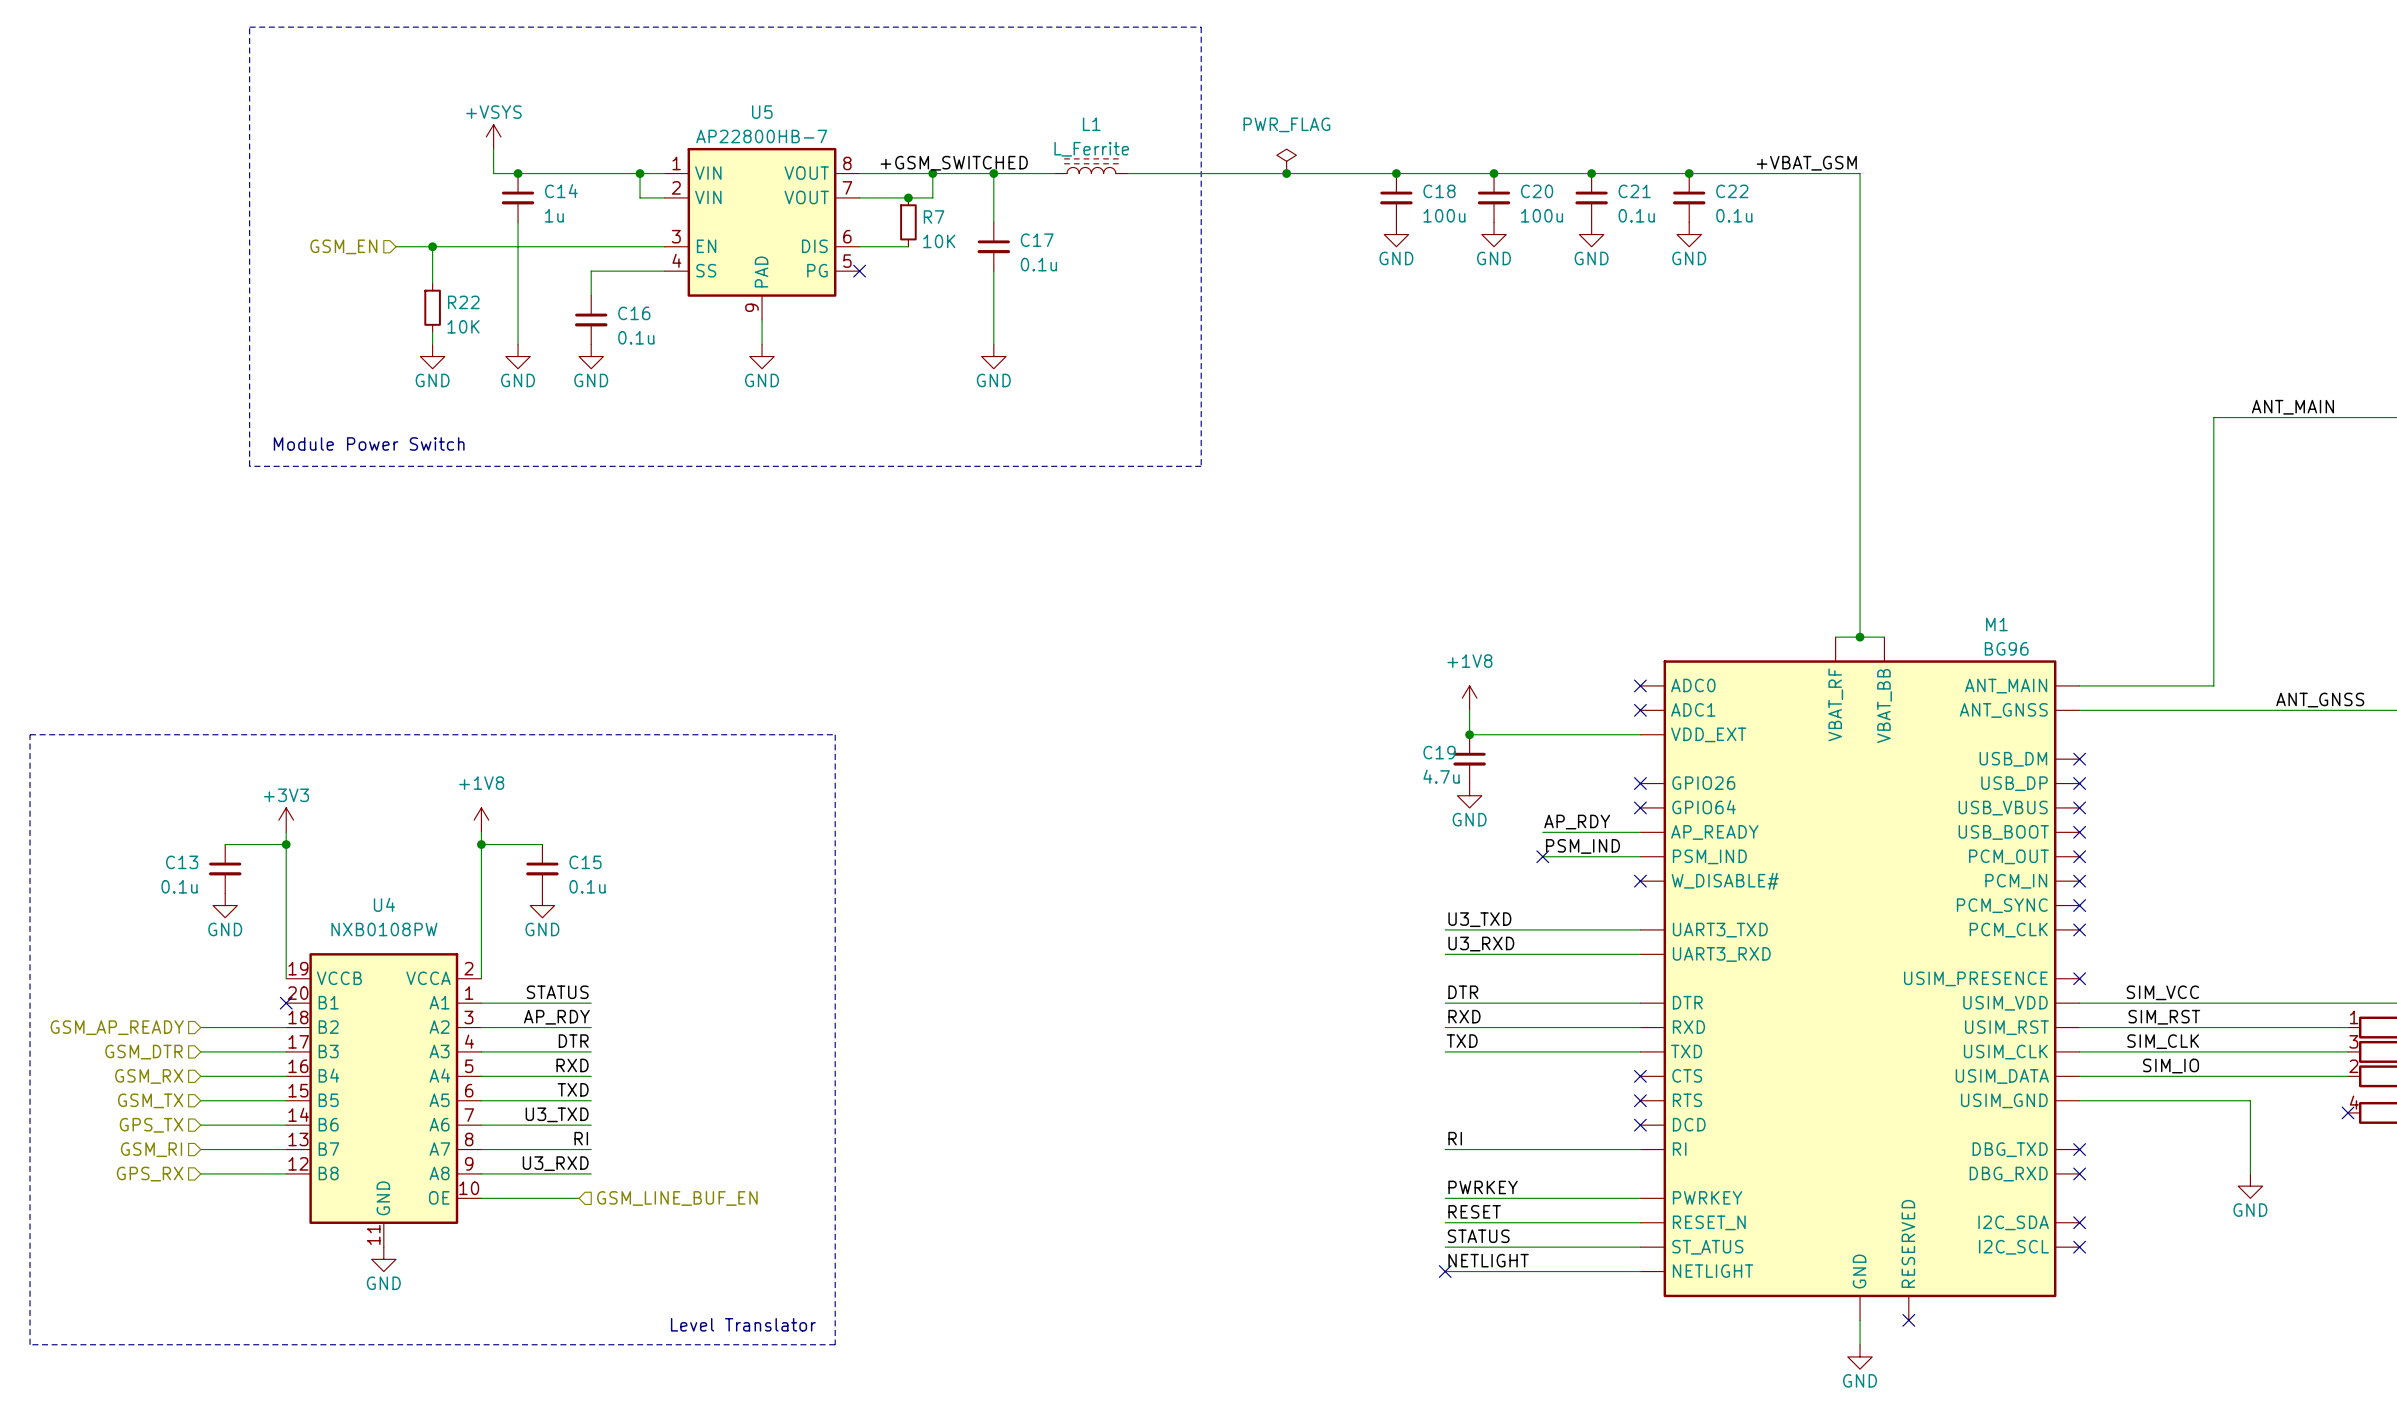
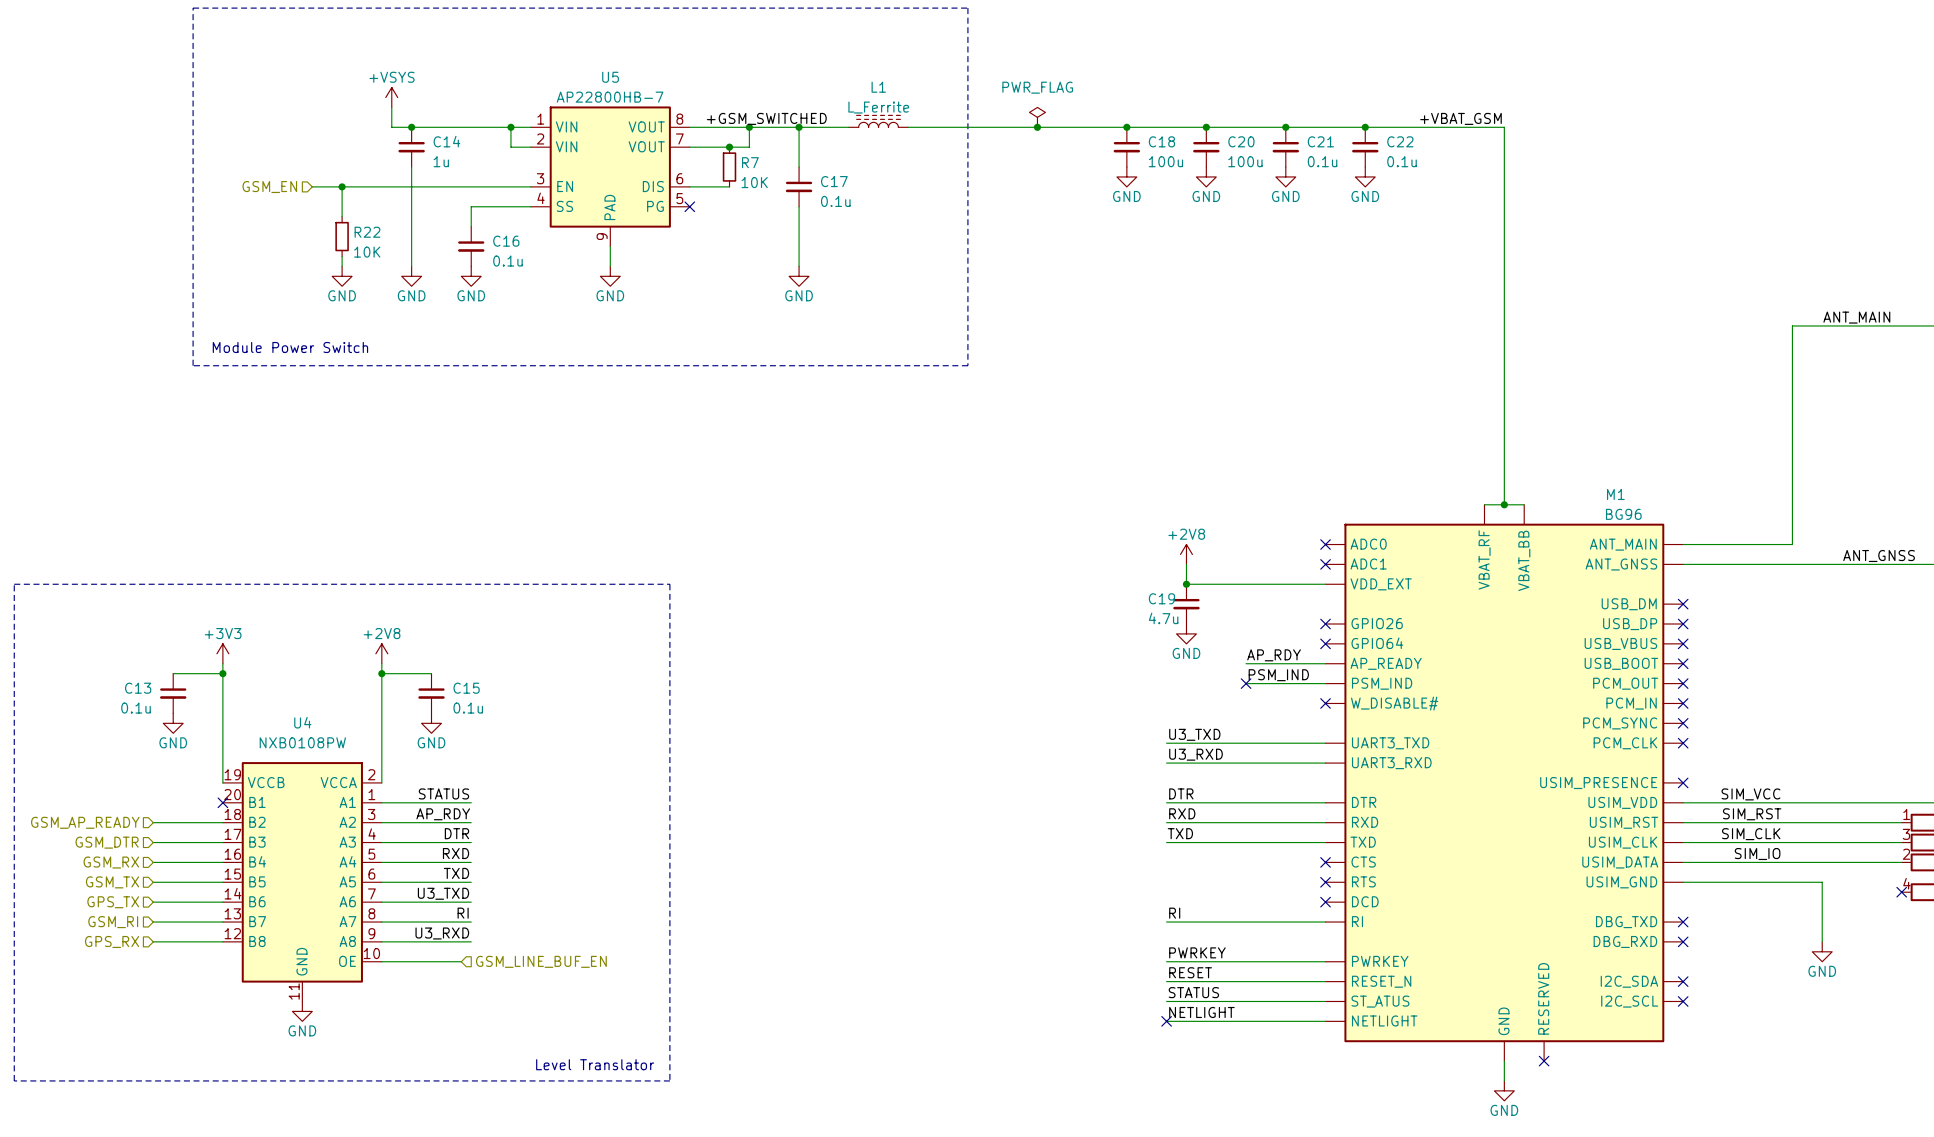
power symbol: +1V8 (1469, 698) -> +2V8 (1186, 554)
power symbol: +1V8 (481, 820) -> +2V8 (381, 653)

